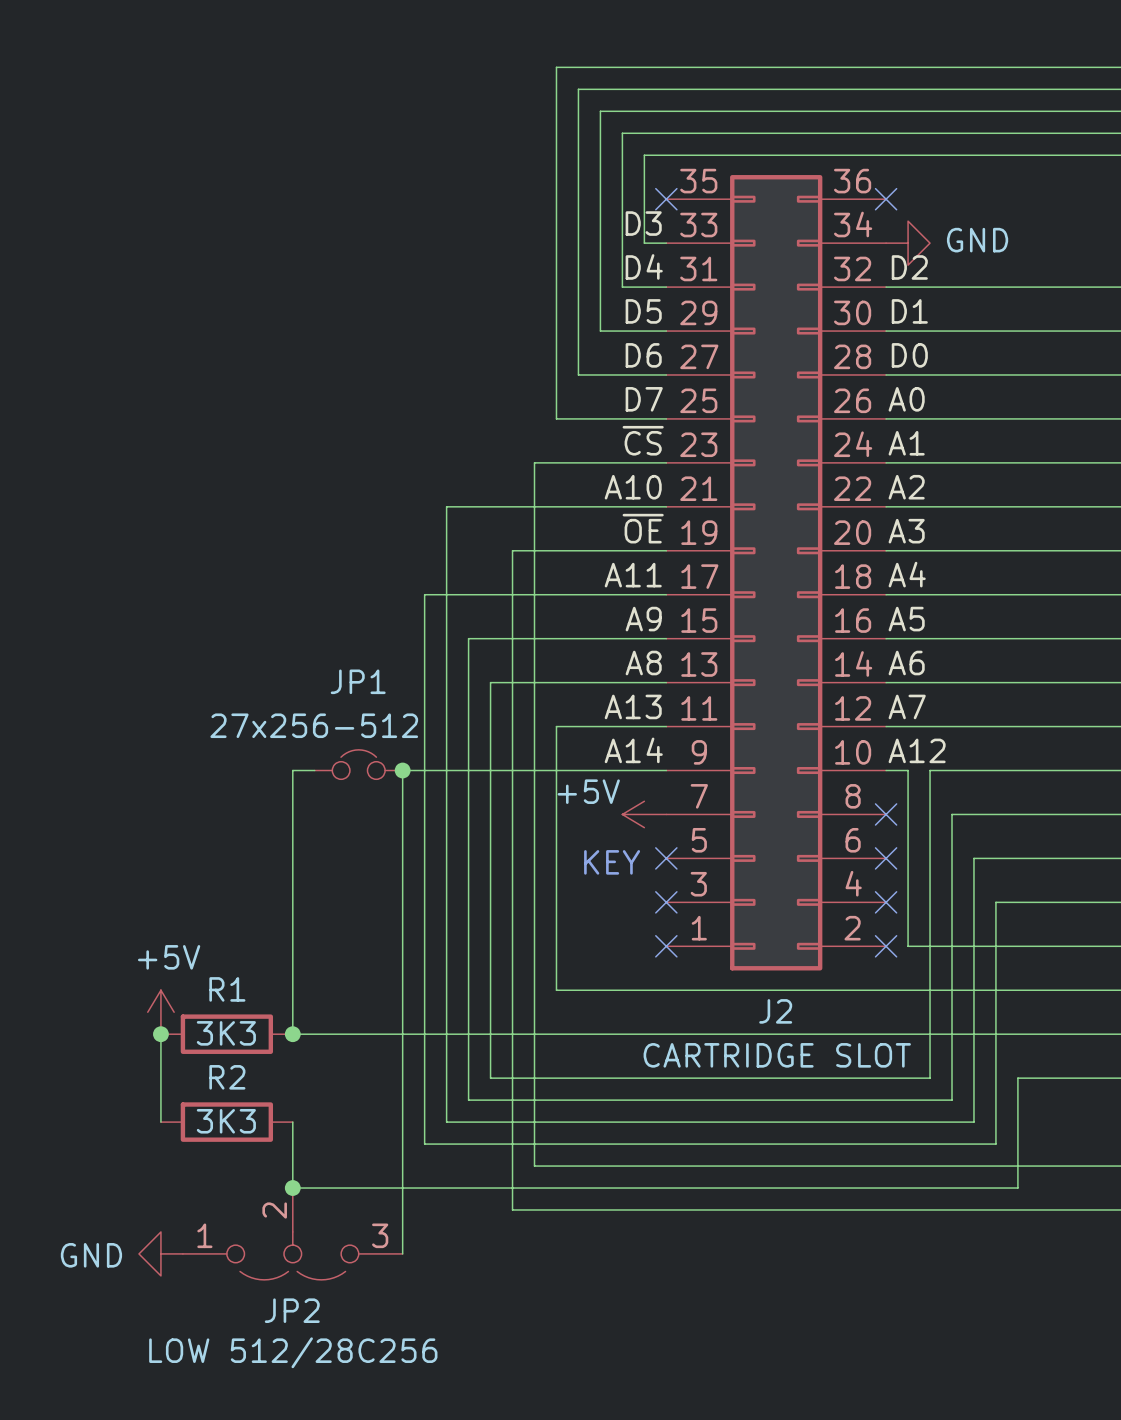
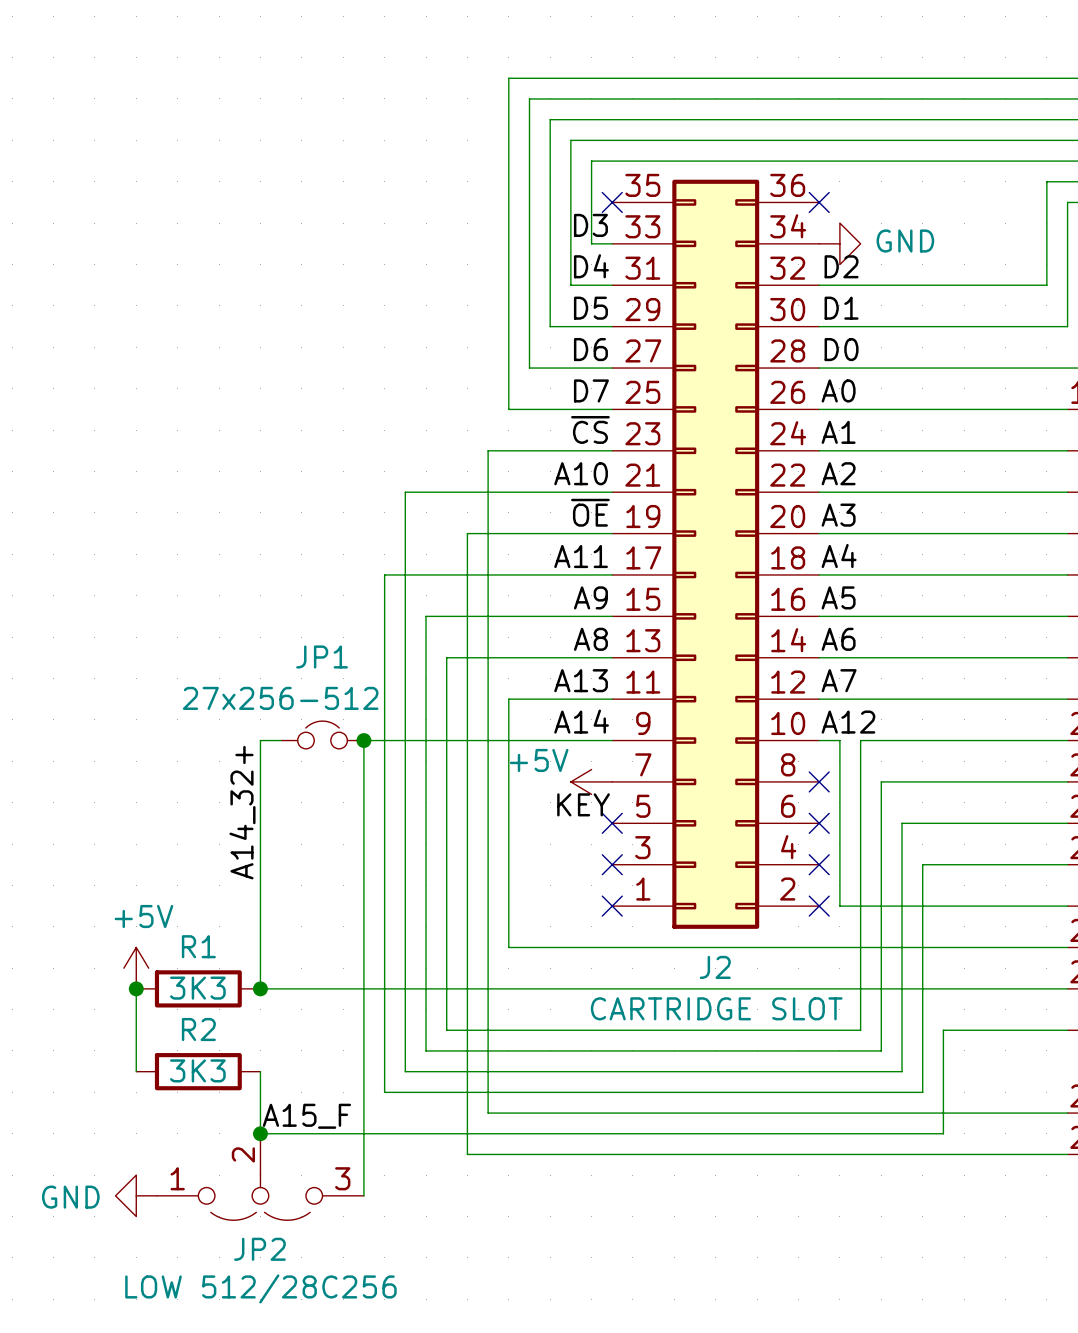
label: none -> KEY (583, 804)
label: none -> A14_32+ (242, 812)
text: KEY (612, 862) -> none
label: none -> A15_F (306, 1116)

